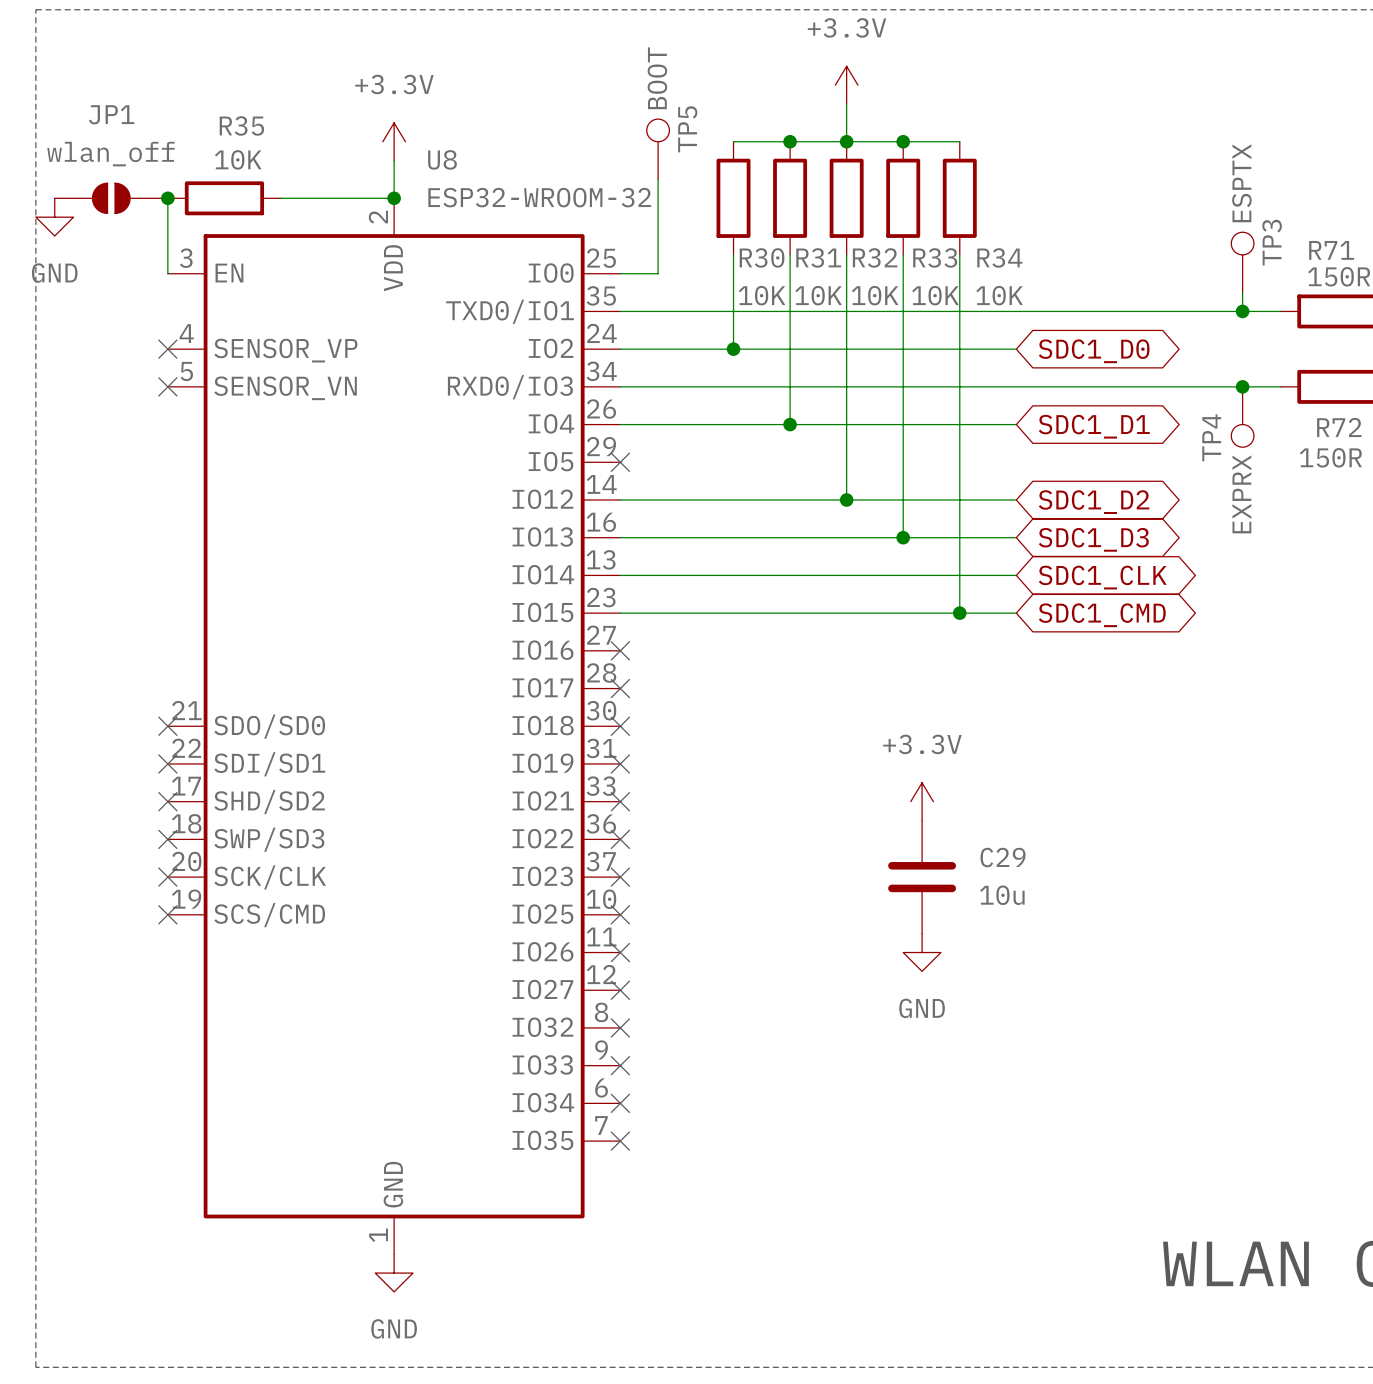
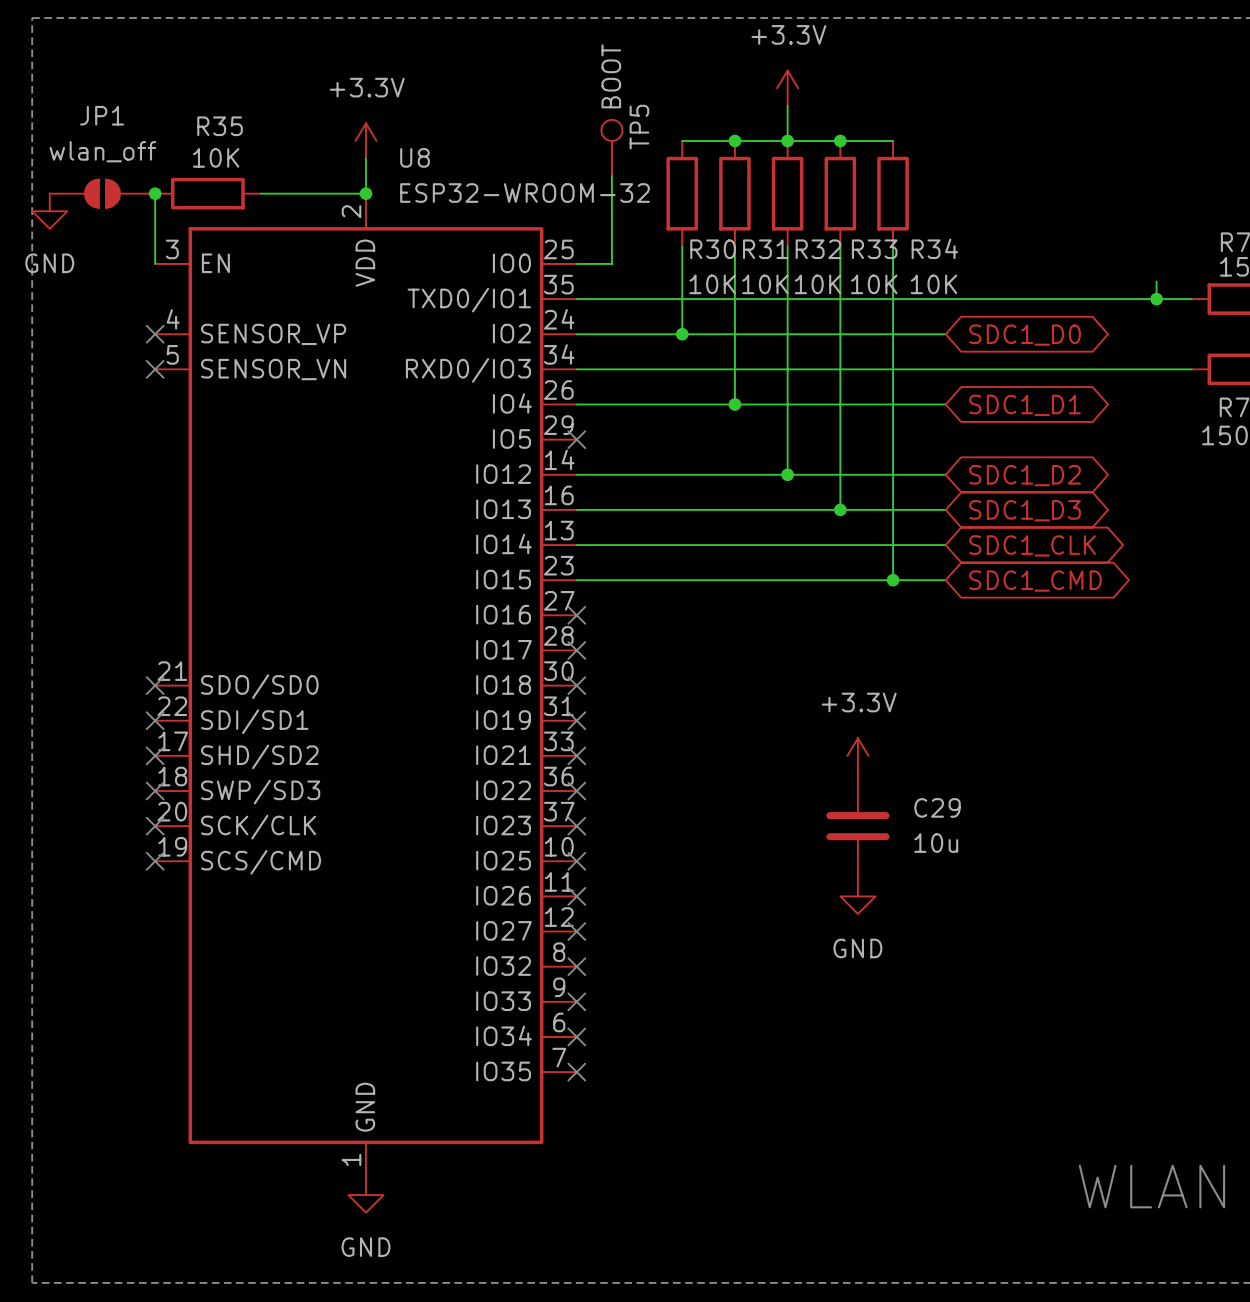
TP3: ESPTX (1242, 262) -> none
junction: (1242, 386) -> none
TP4: EXPRX (1242, 417) -> none

